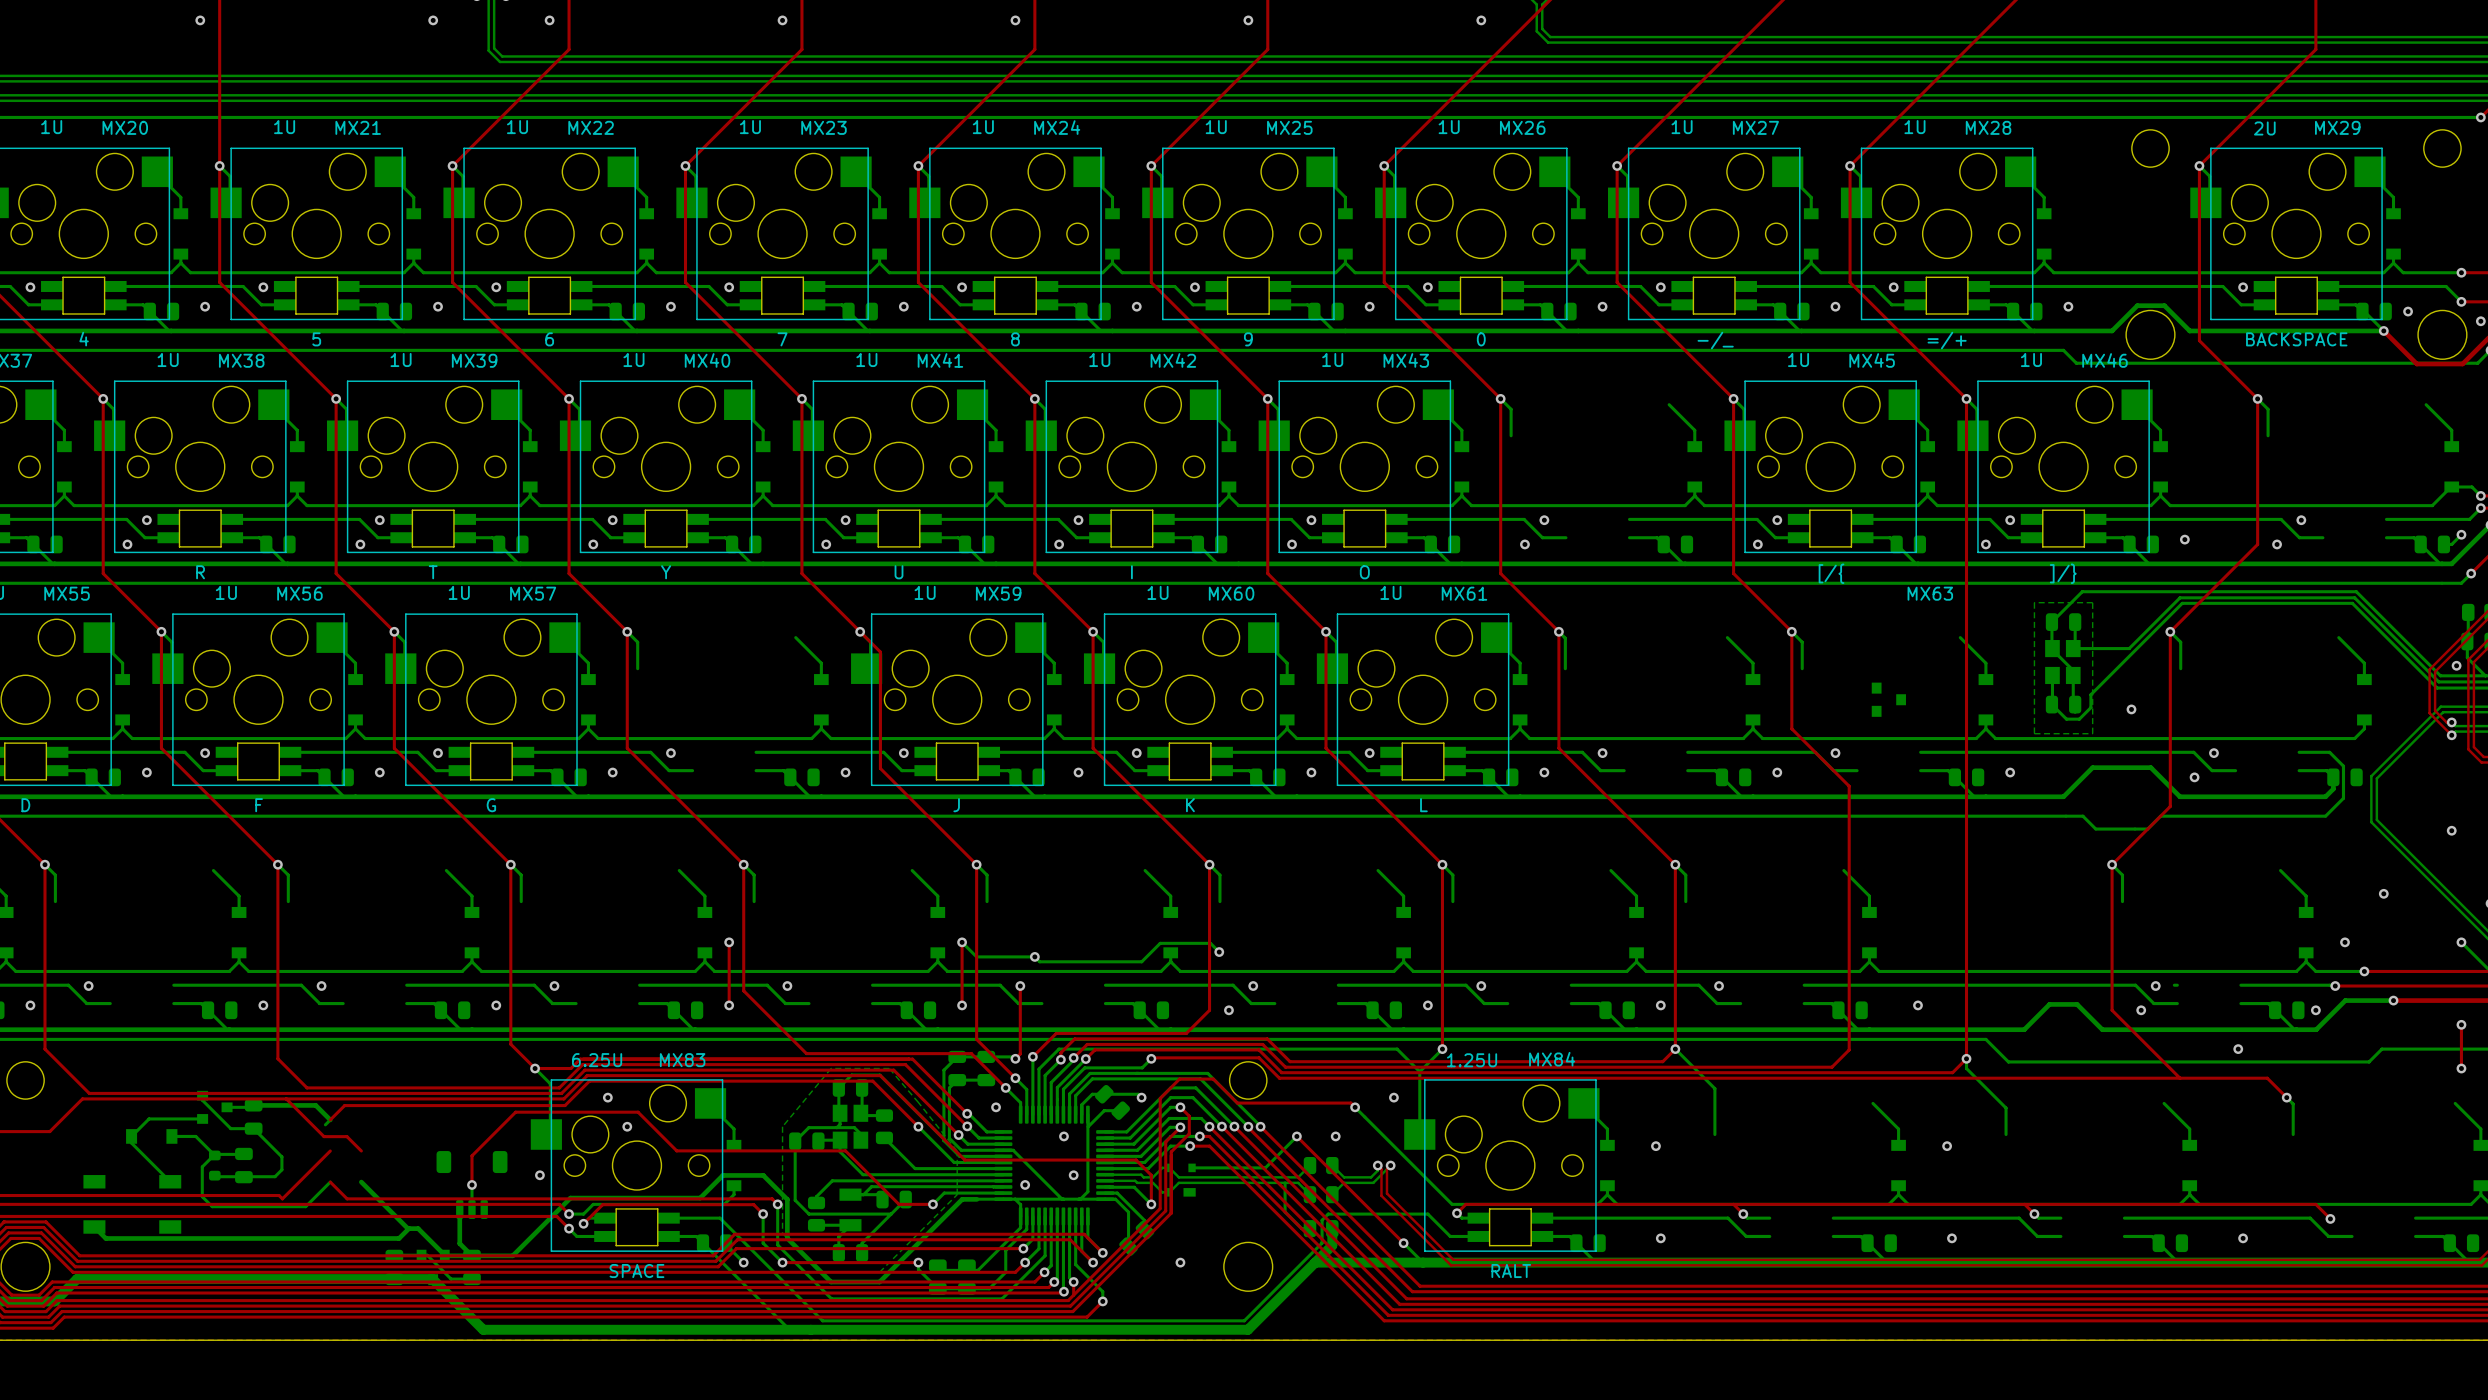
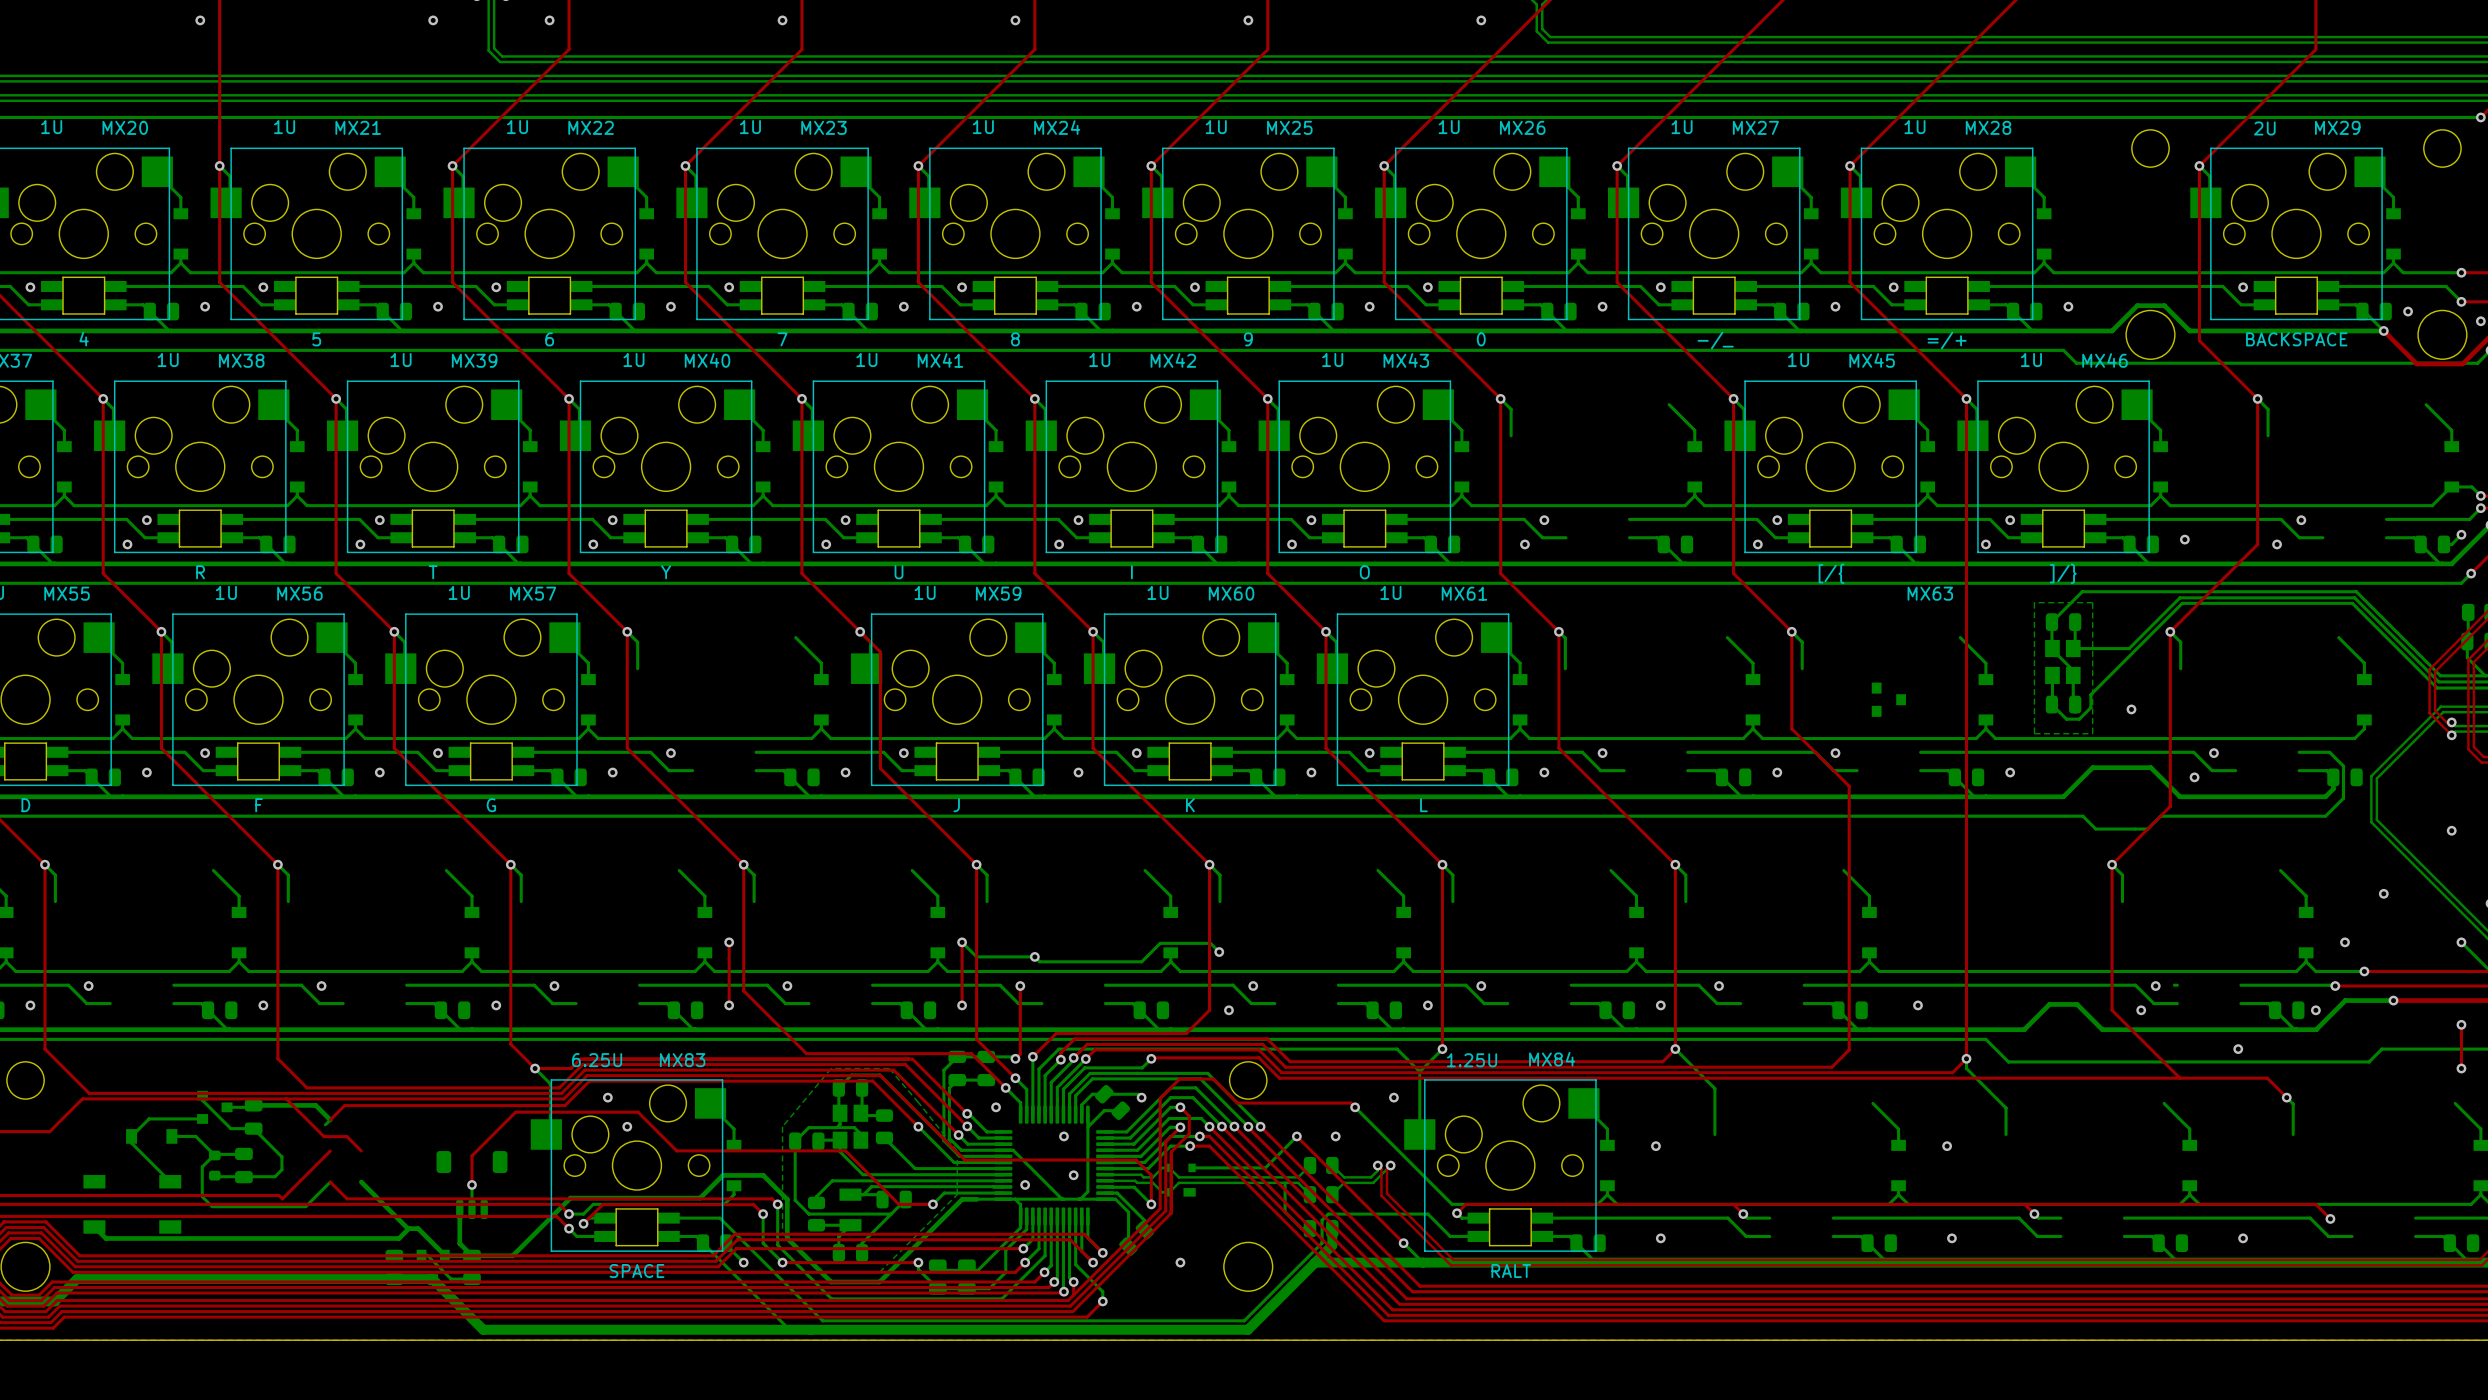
via: (2456, 665) -> none
via: (539, 1175) -> none

